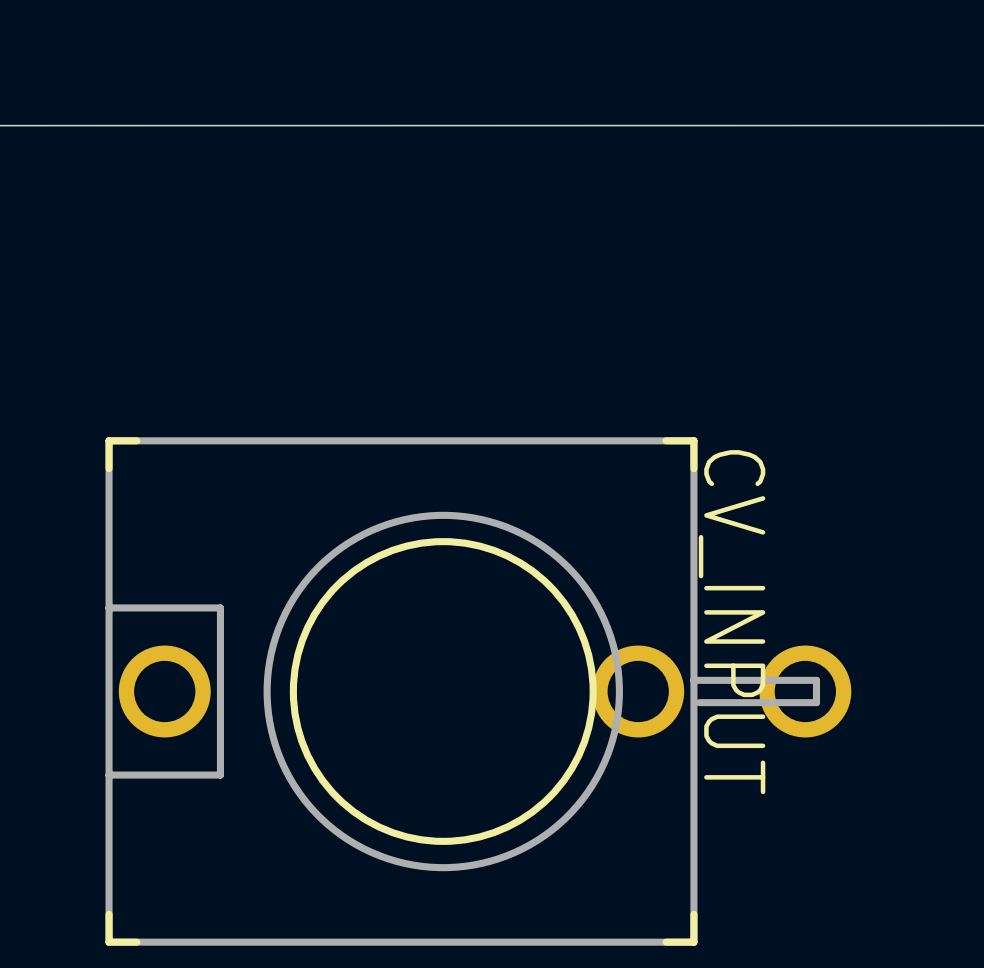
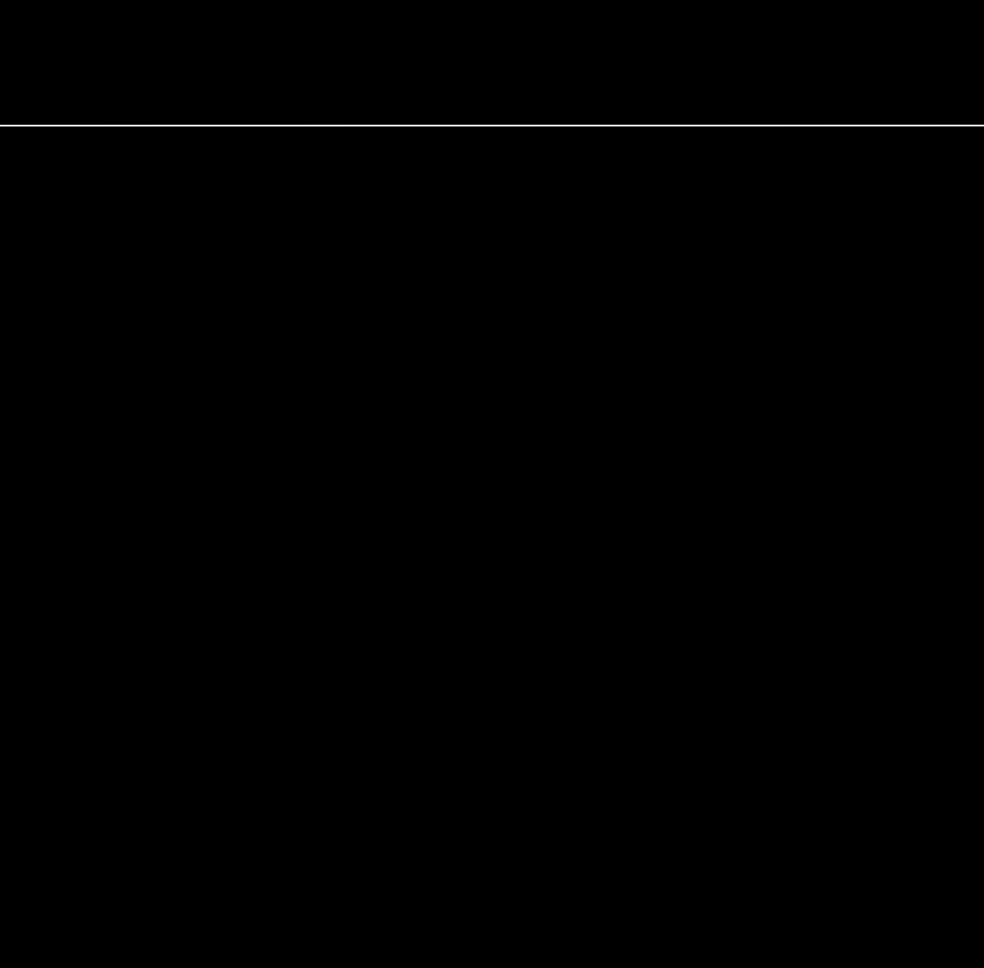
CV_INPUT: (478, 691) -> none

